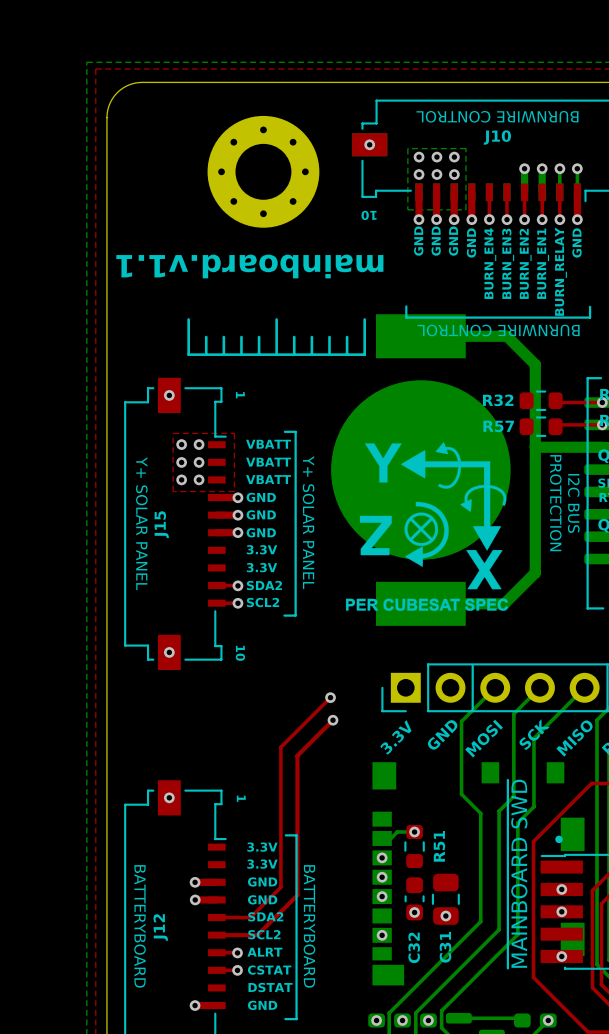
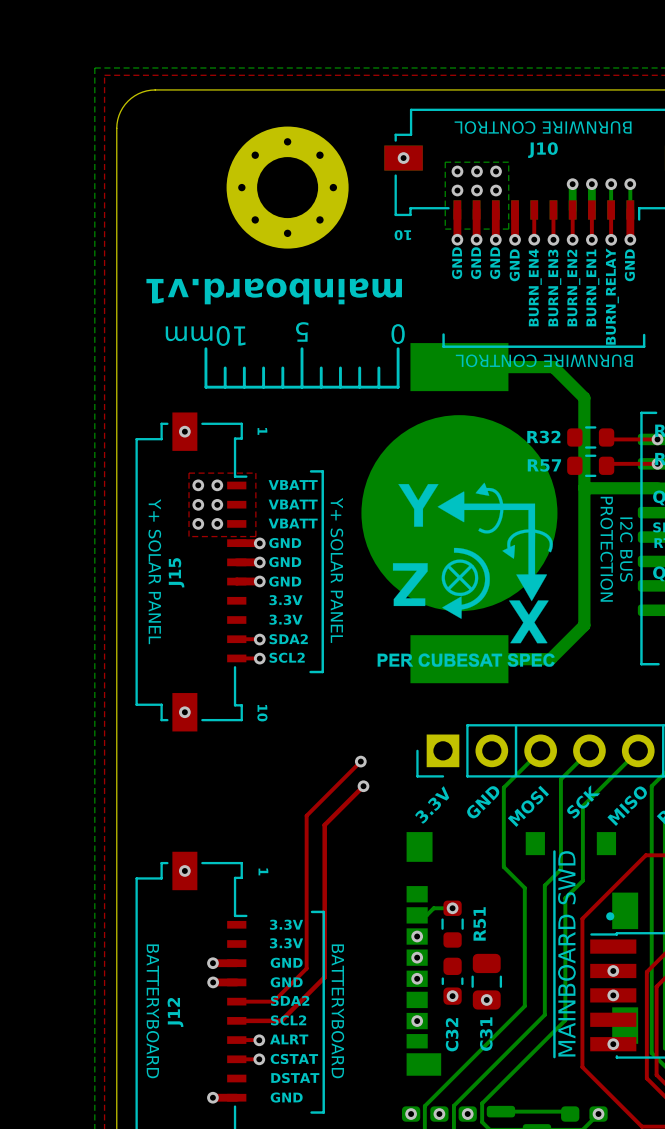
text: mainboard.v1.1 (249, 266) -> mainboard.v1 (274, 291)
drawing shape: [187, 318, 367, 356] -> [165, 322, 405, 389]

